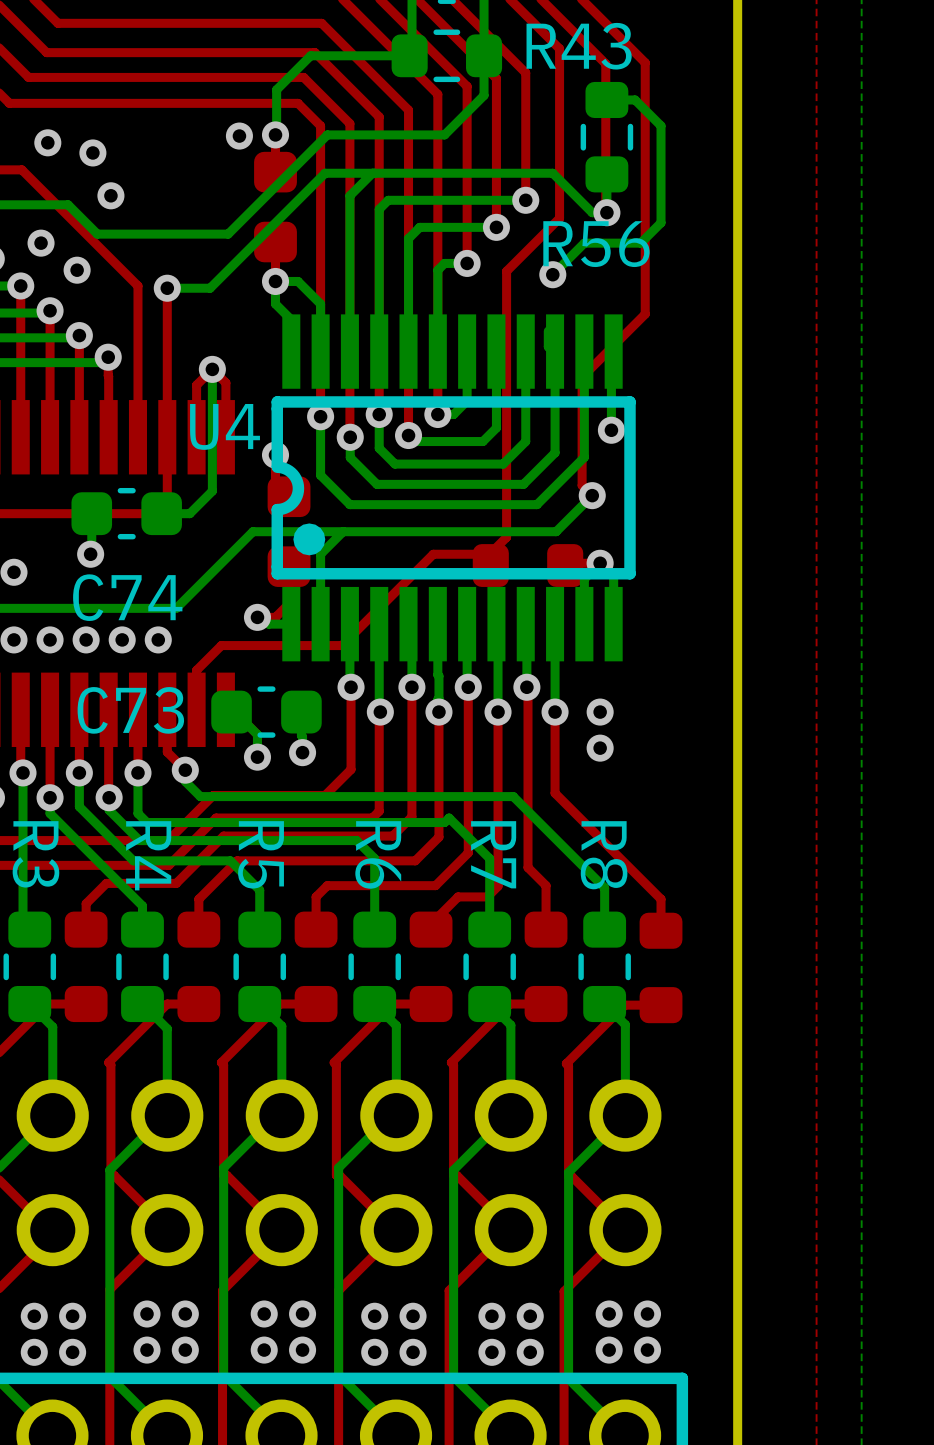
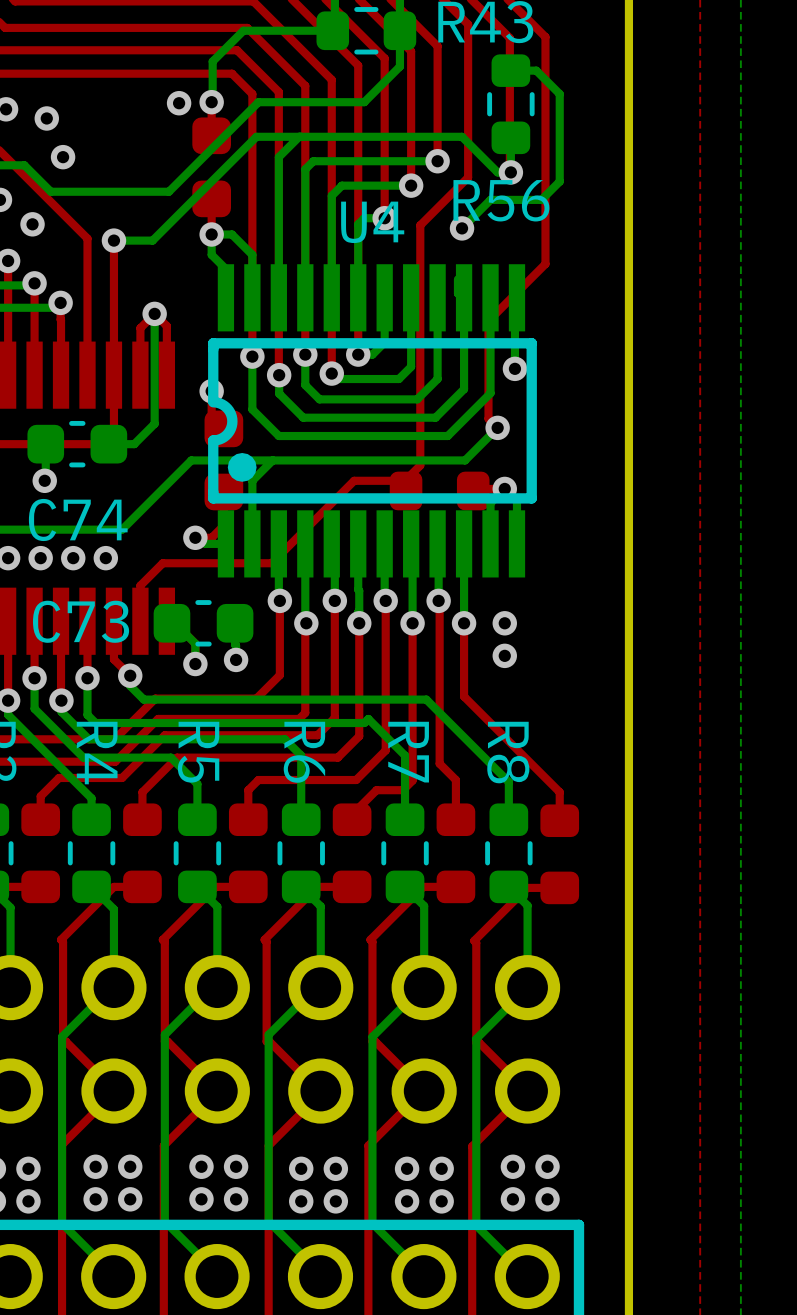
U4 name position: U4 (225, 426) -> U4 (372, 222)

